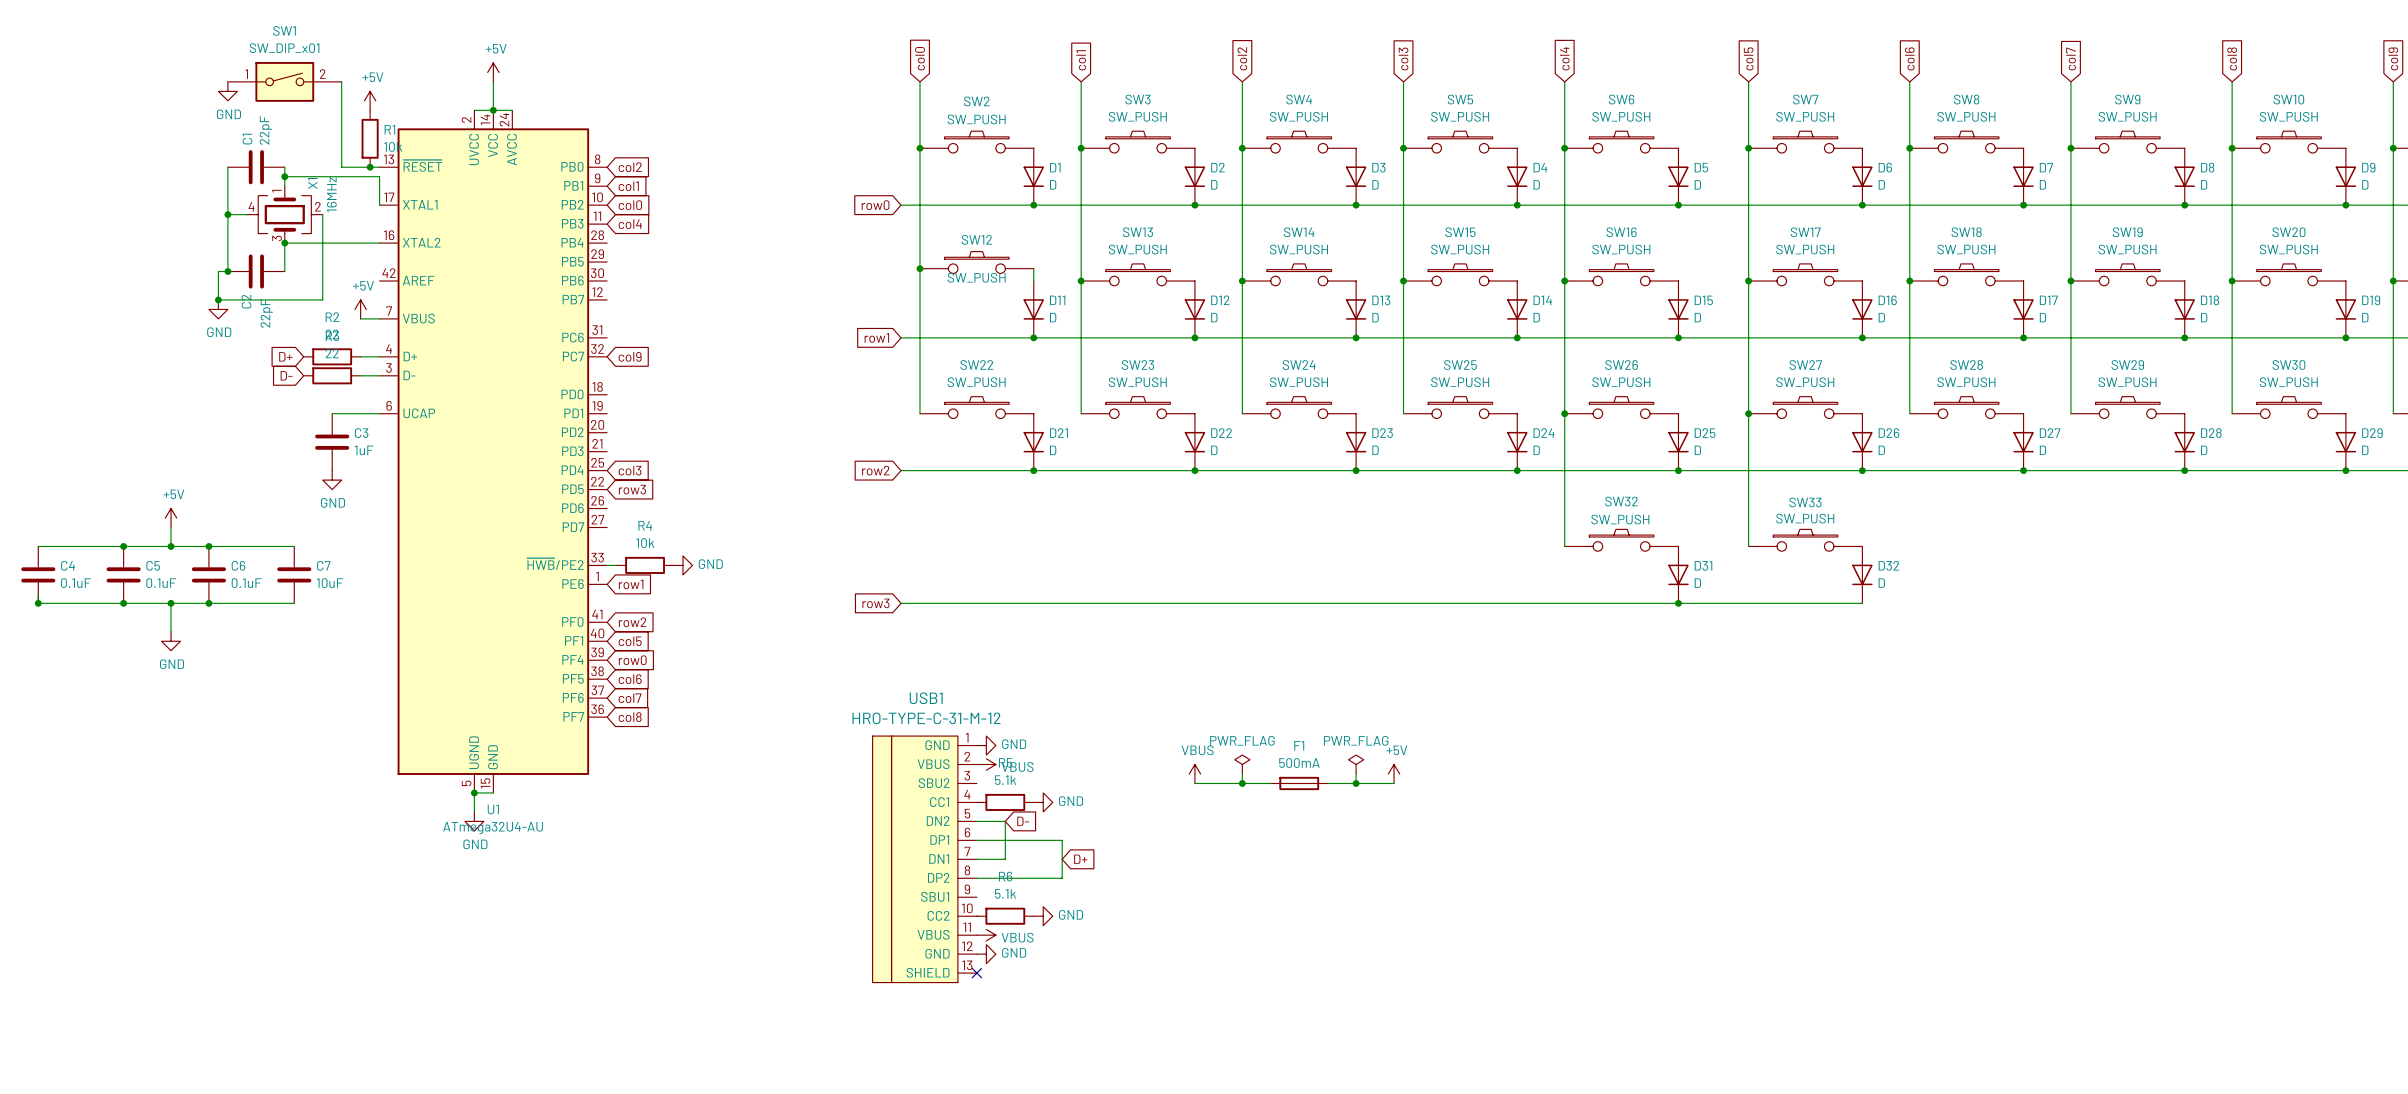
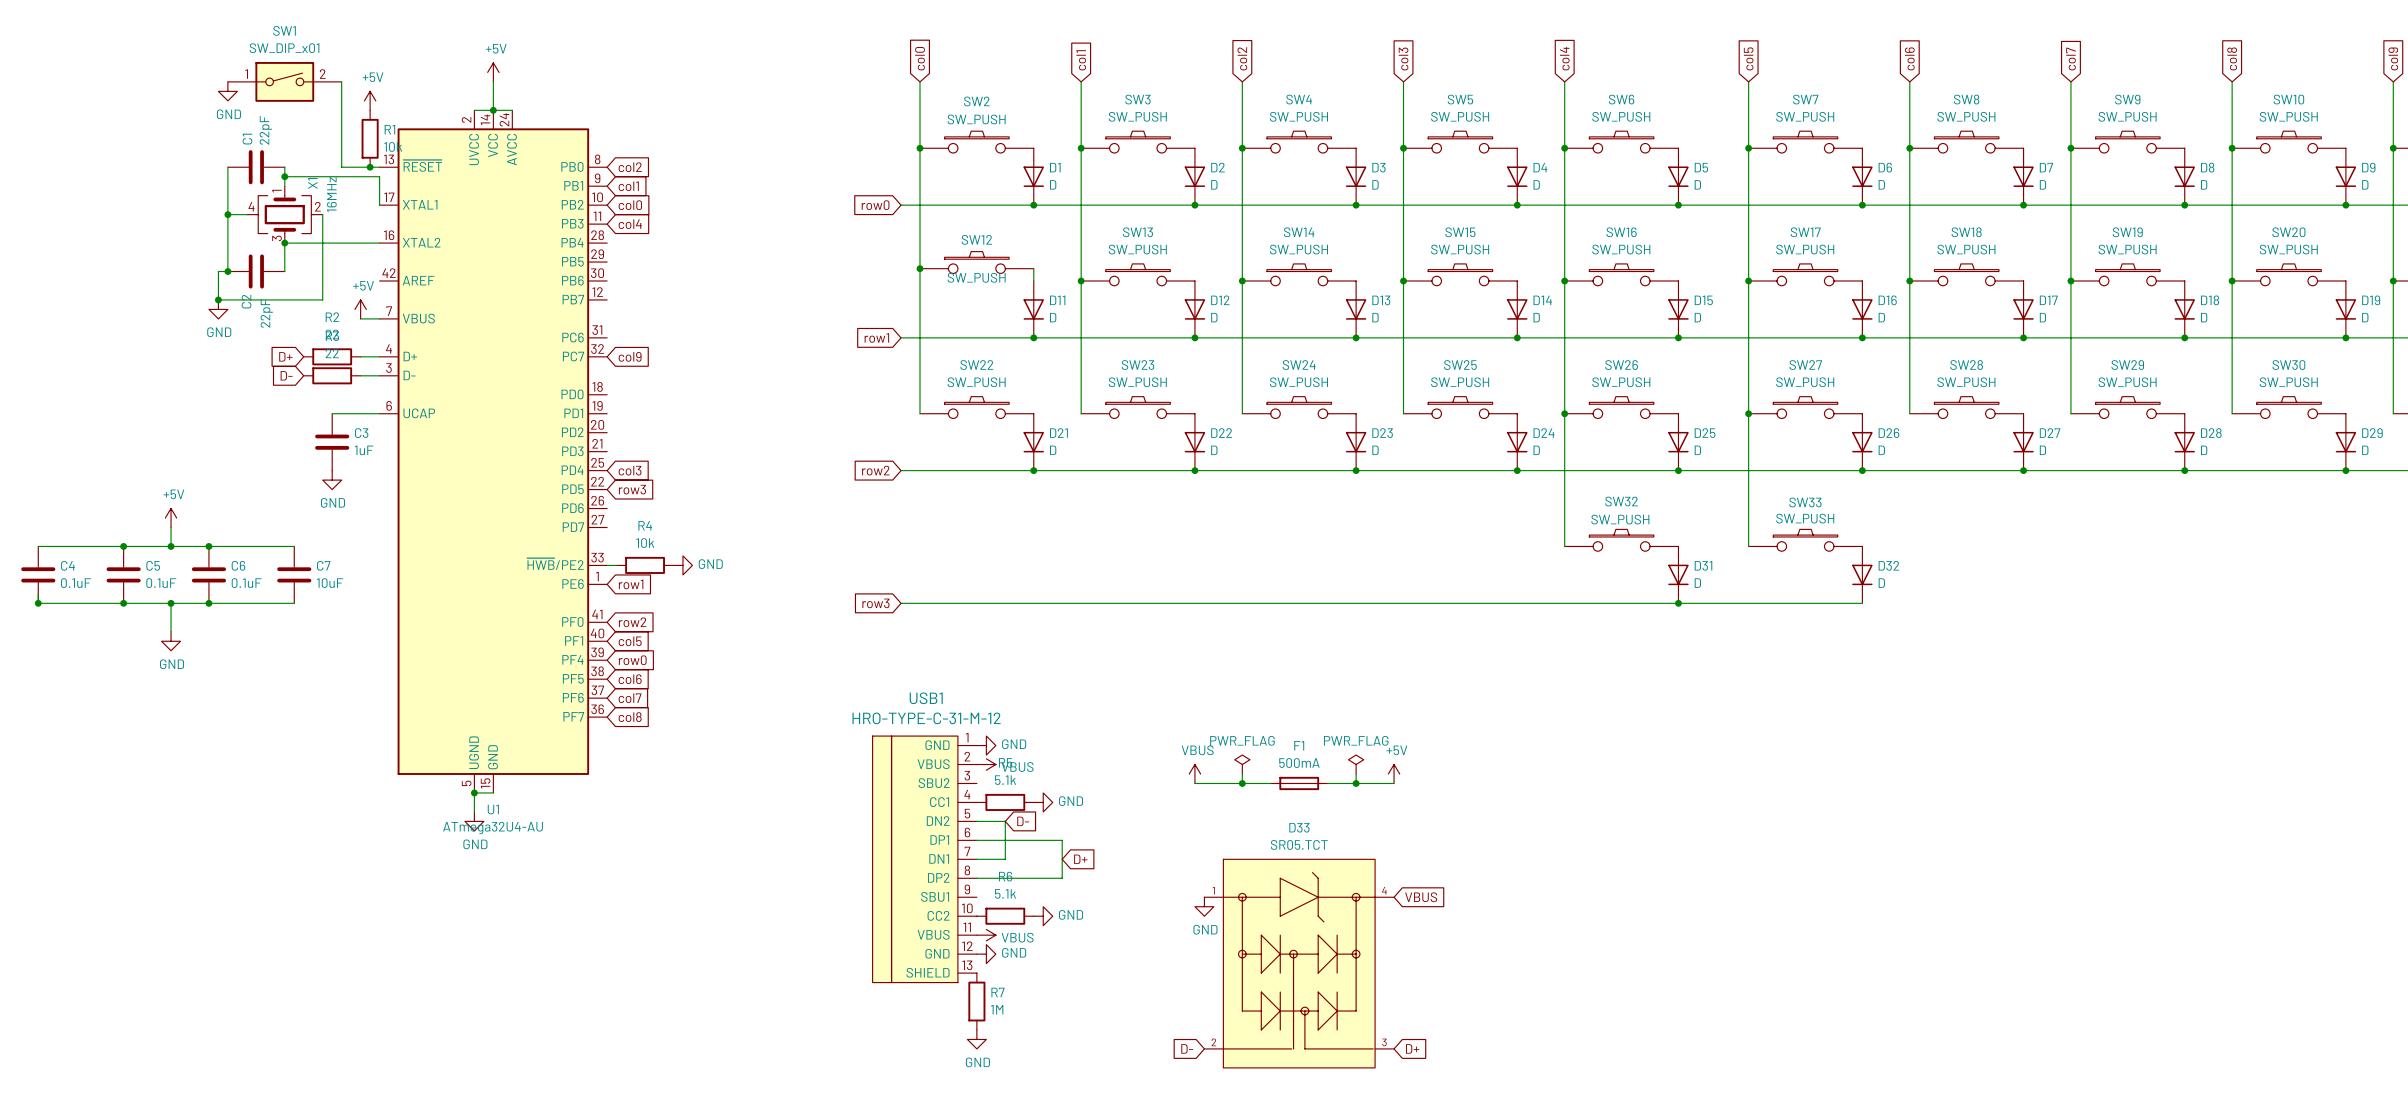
global label: none -> VBUS (1421, 897)
power symbol: none -> GND (1204, 906)
D33: none -> SR05.TCT (1299, 963)
no-connect mark: (976, 973) -> none
R7: none -> 1M (976, 1001)
power symbol: none -> GND (976, 1039)
global label: none -> D- (1187, 1048)
global label: none -> D+ (1412, 1048)

